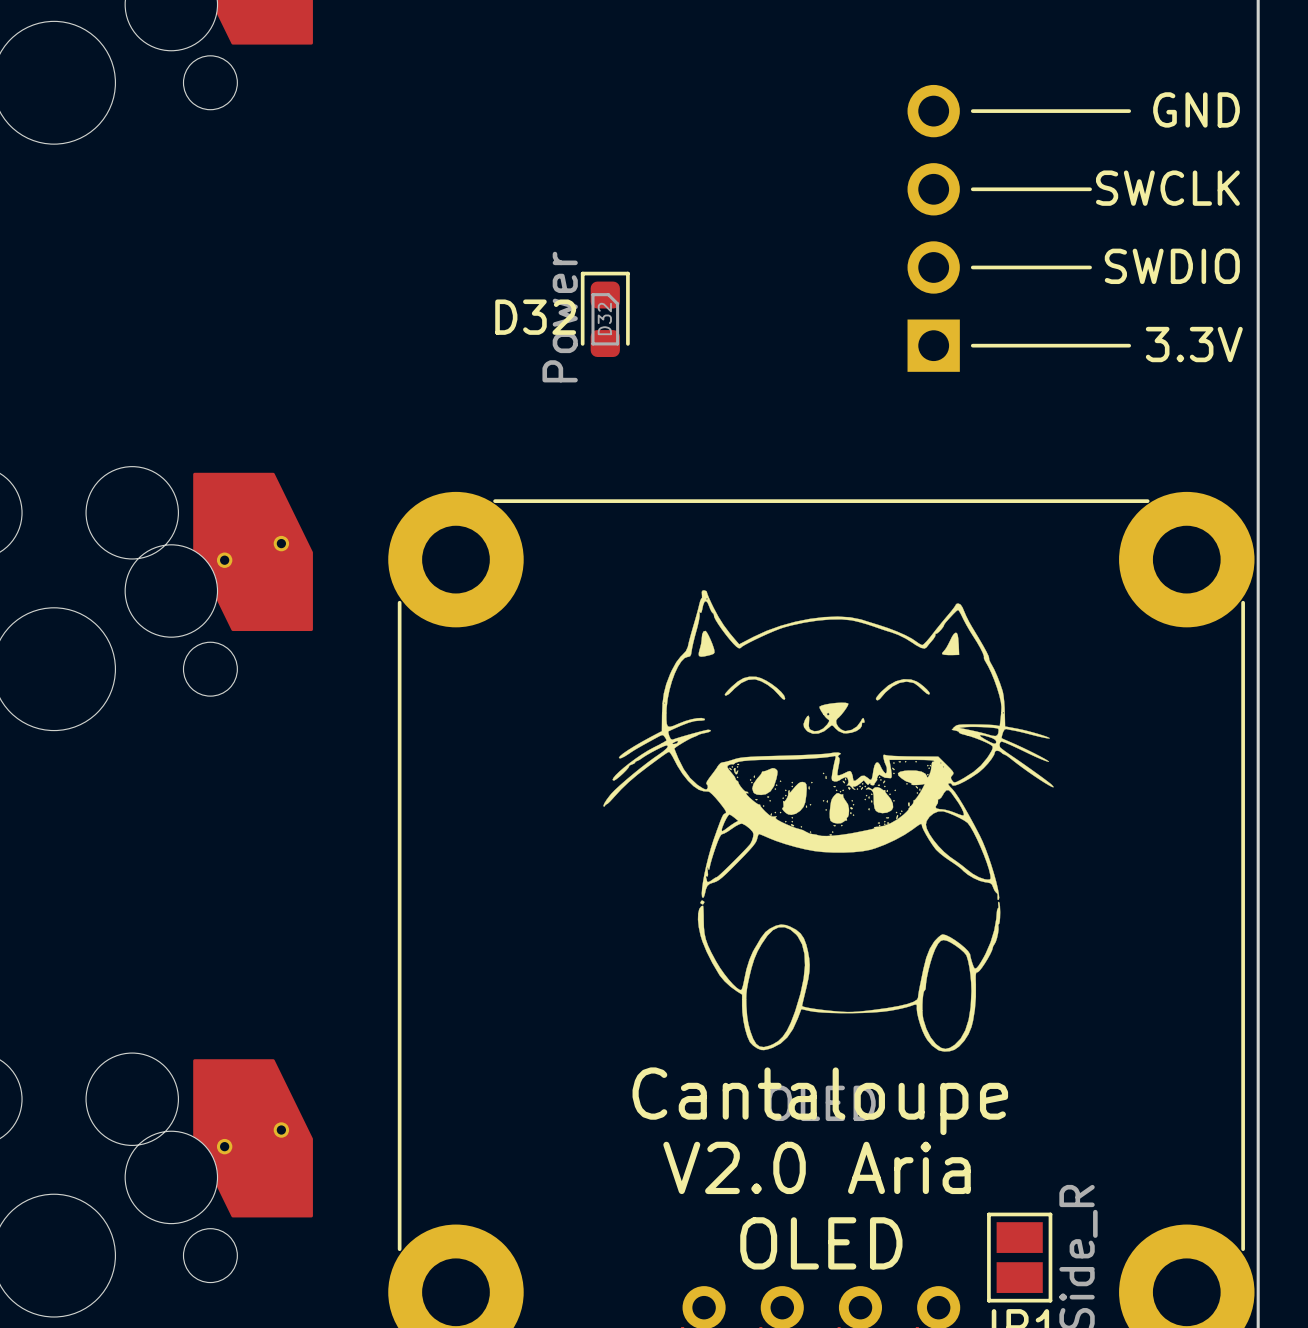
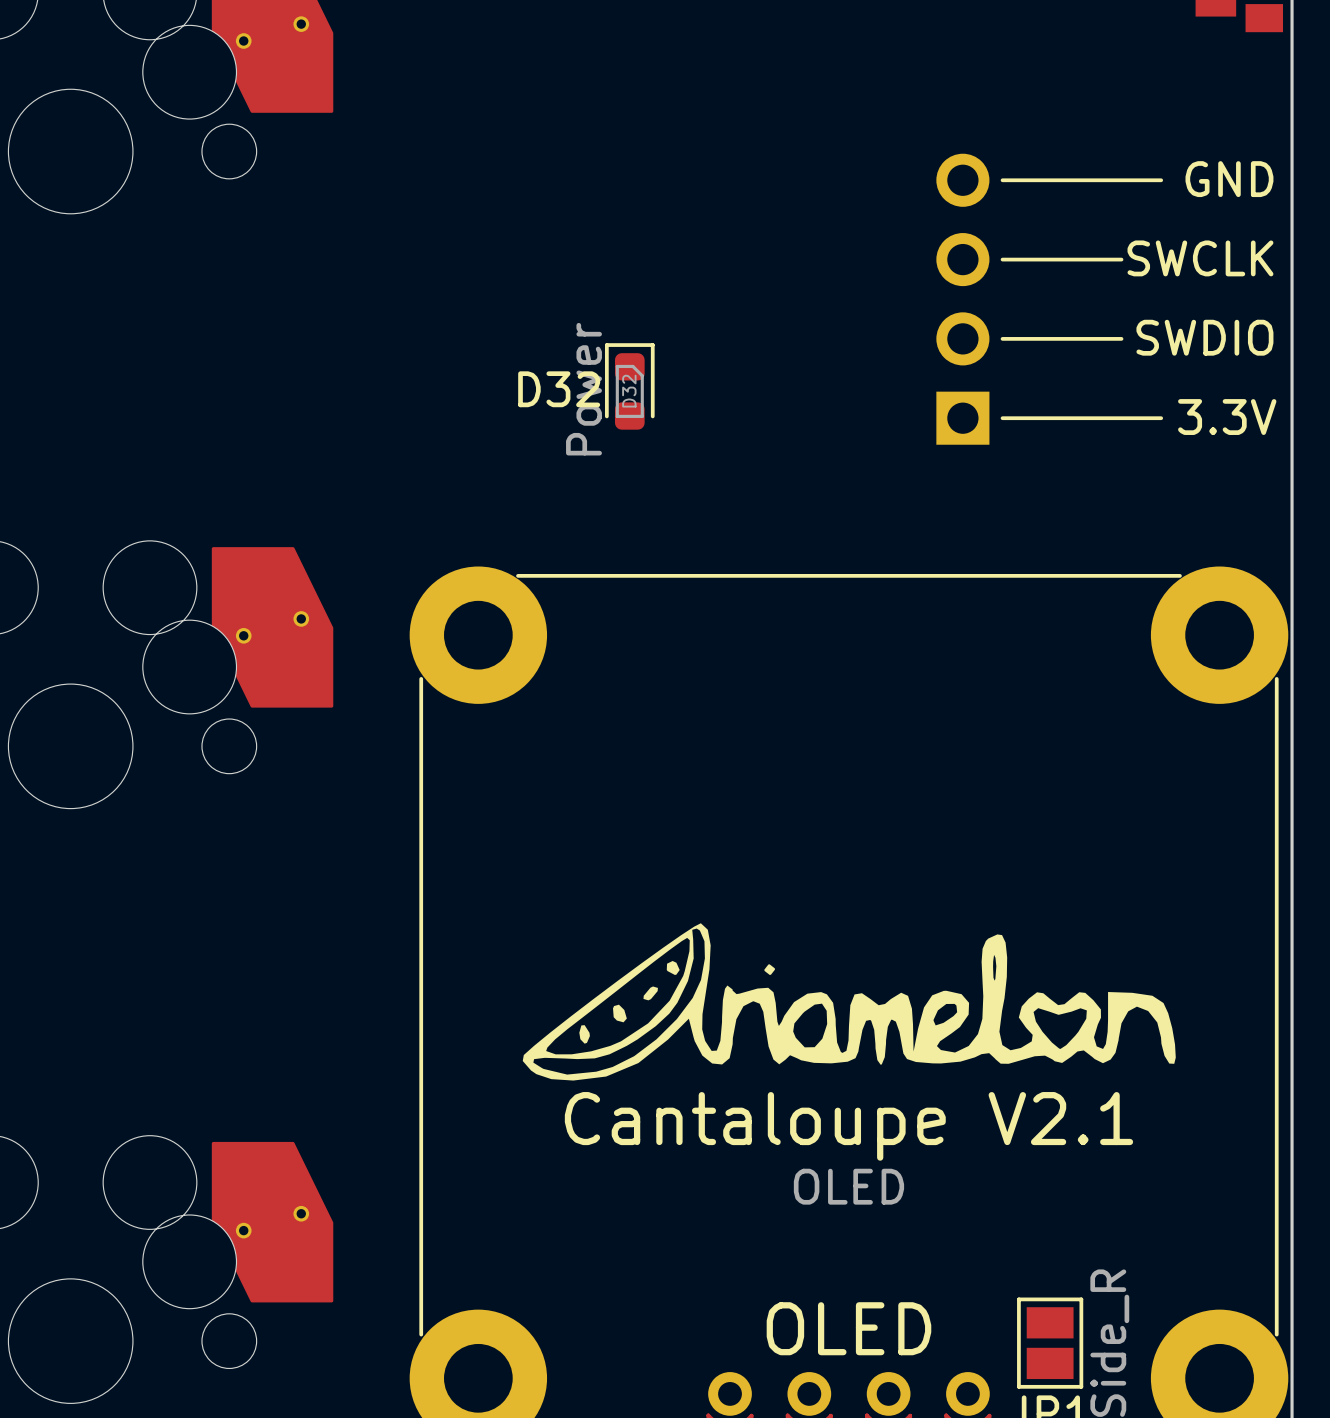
drawing: [603, 590, 1054, 1052] -> none
drawing: none -> [522, 923, 1176, 1081]
text: Cantaloupe (820, 1101) -> Cantaloupe V2.1 (848, 1126)
text: V2.0 Aria (817, 1167) -> none

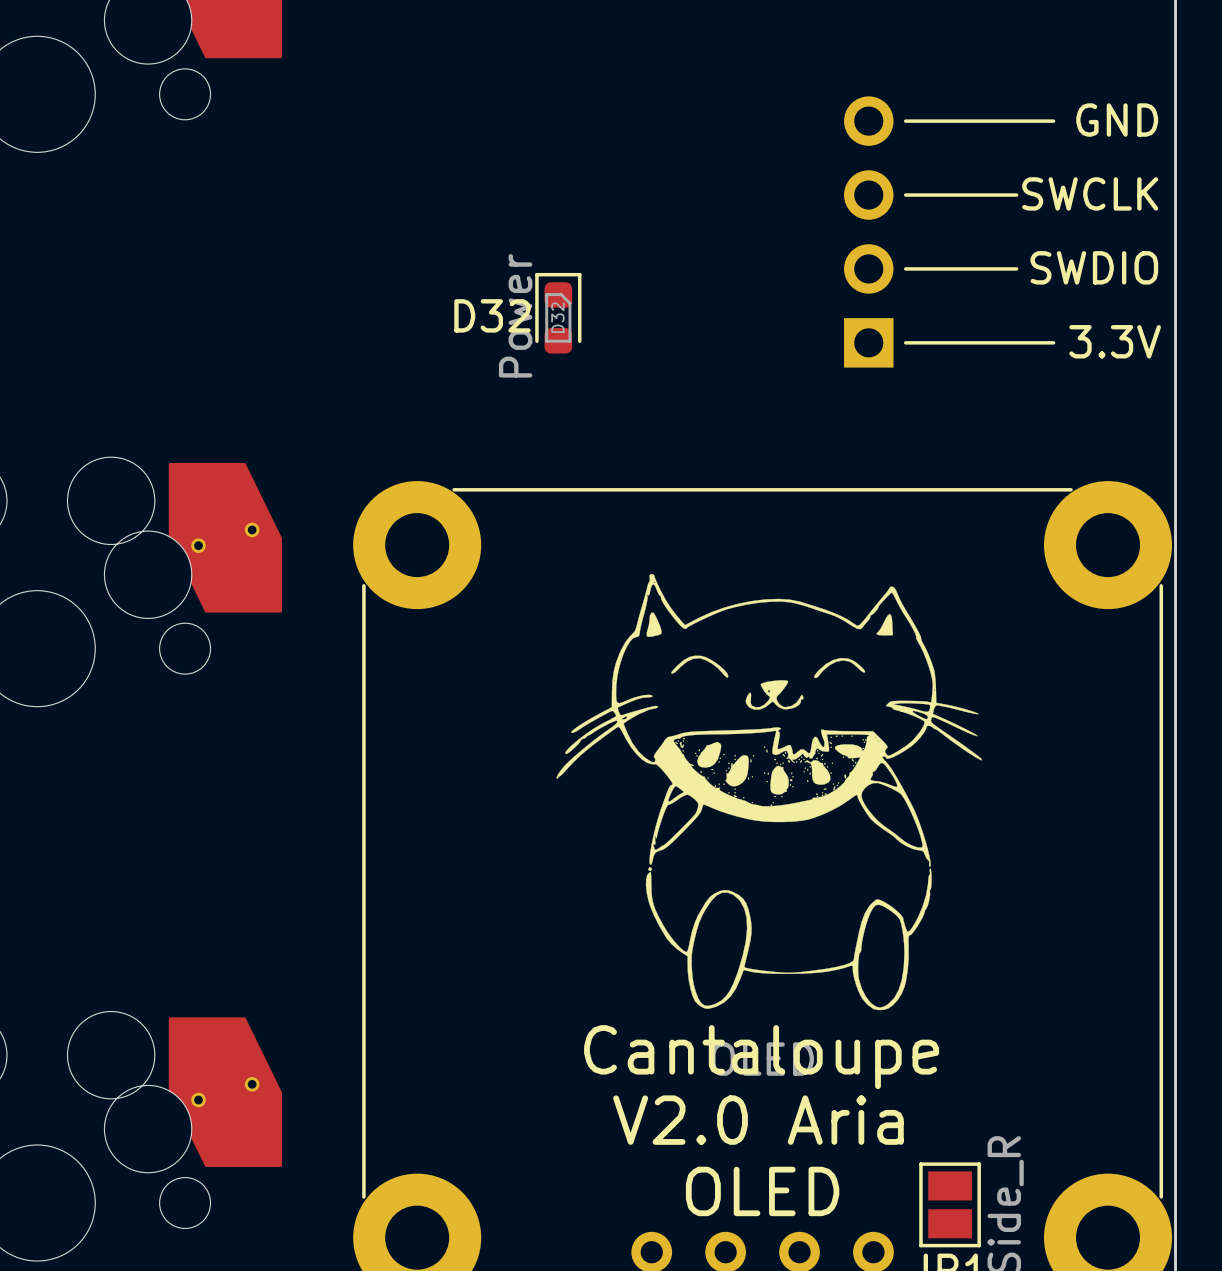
drawing: none -> [556, 573, 983, 1011]
drawing: [522, 923, 1176, 1081] -> none
text: Cantaloupe V2.1 (848, 1126) -> Cantaloupe (761, 1057)
text: none -> V2.0 Aria (758, 1120)

